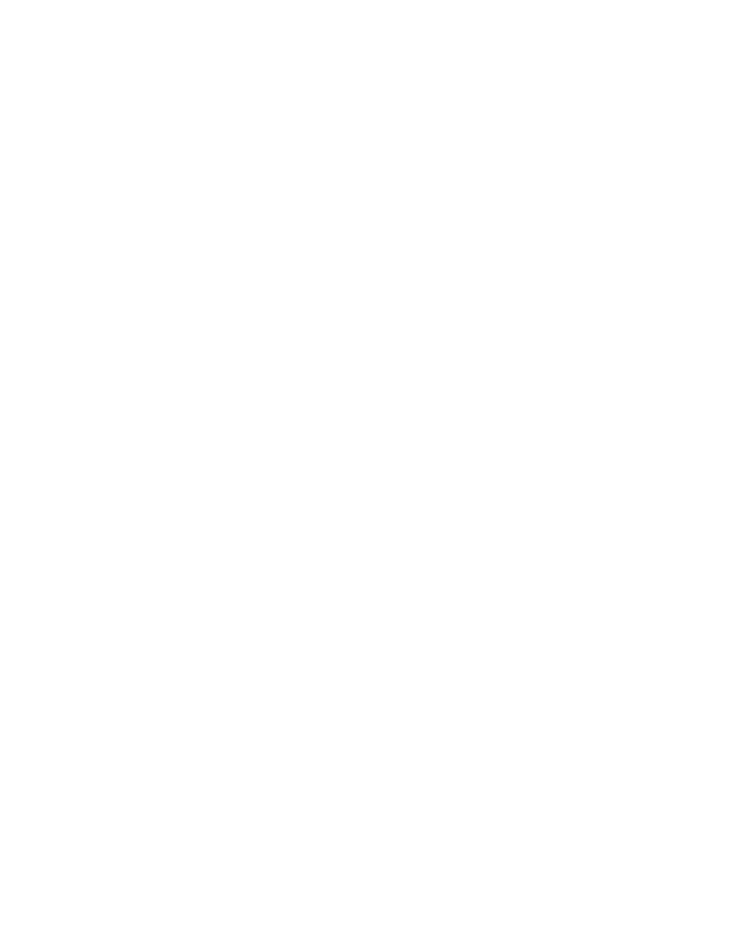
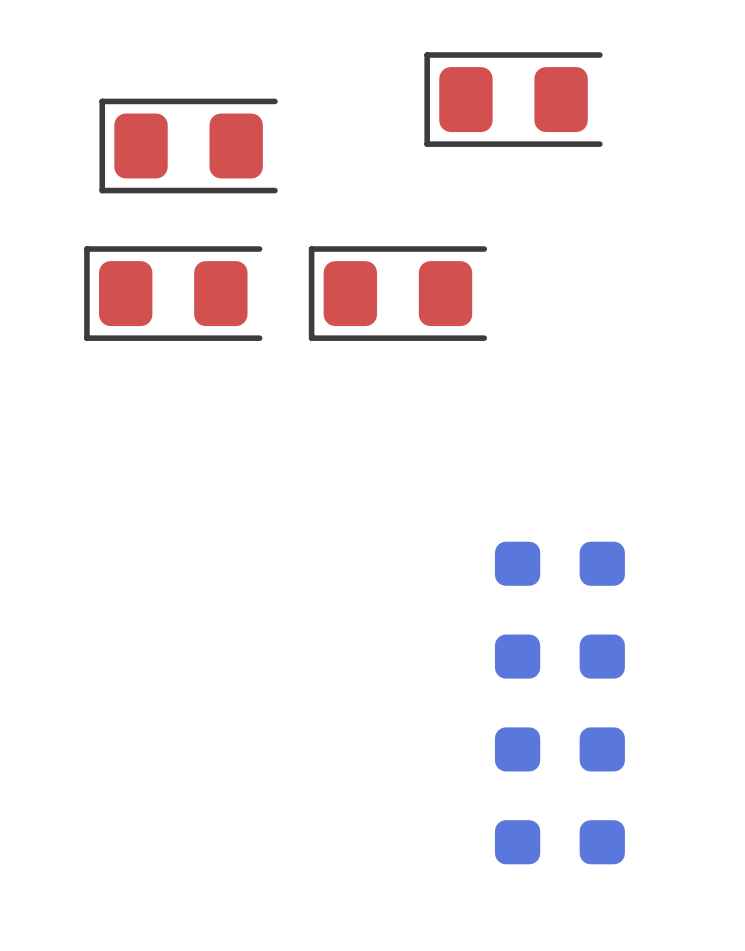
part: none -> (513, 99)
part: none -> (188, 145)
part: none -> (173, 293)
part: none -> (397, 293)
part: none -> (559, 563)
part: none -> (559, 656)
part: none -> (559, 749)
part: none -> (559, 842)

